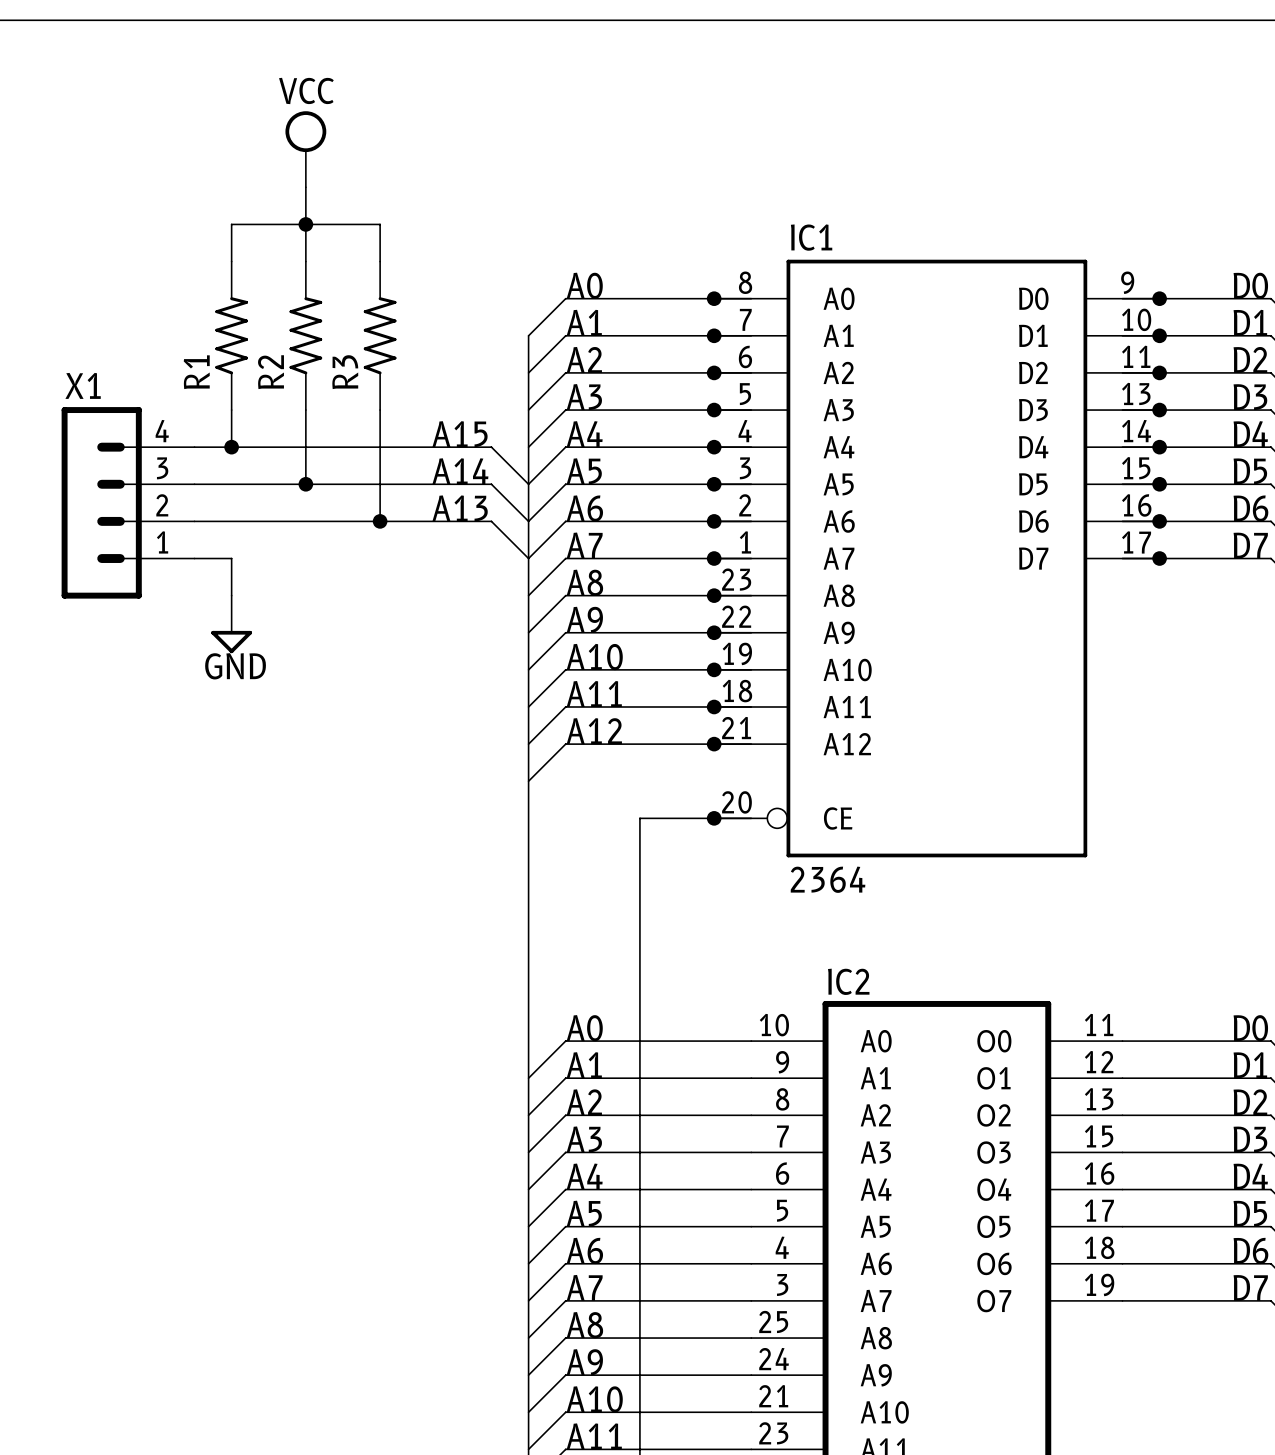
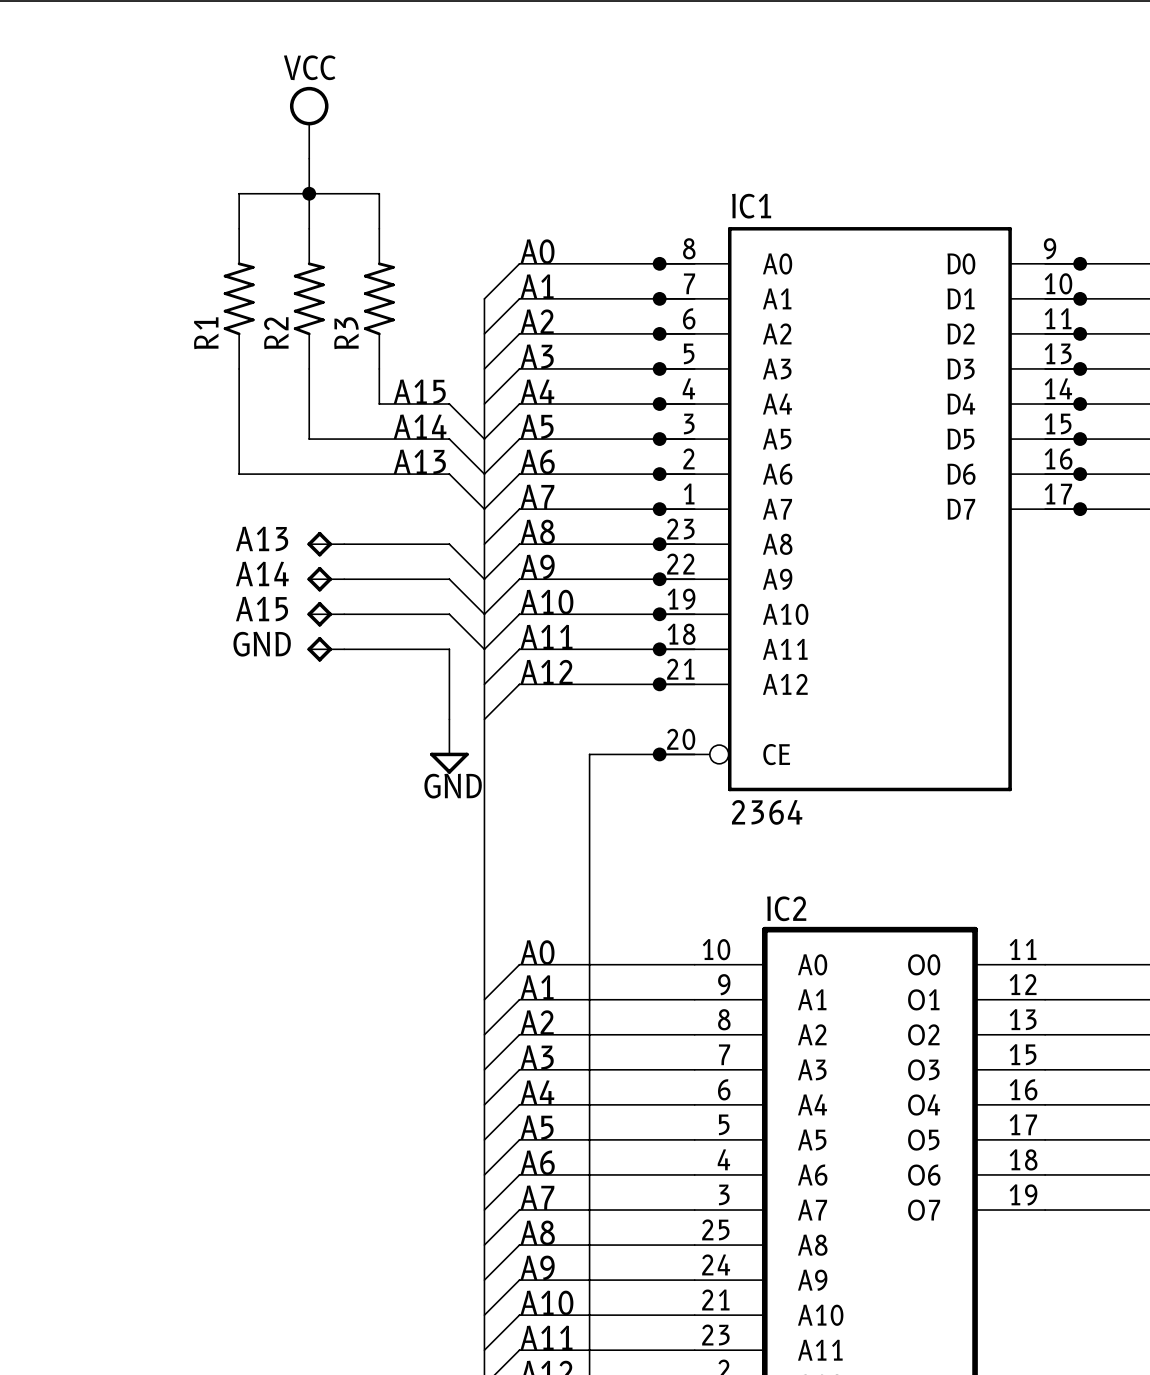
power symbol position: VCC (305, 149) -> VCC (309, 122)
wire: (305, 187) (305, 261) -> (309, 158) (309, 228)
wire: (268, 224) (231, 224) (231, 261) -> (239, 193) (239, 228)
junction position: (305, 224) -> (309, 193)
wire: (380, 224) (380, 261) -> (344, 193) (379, 193) (379, 228)
R1 position: (231, 335) -> (239, 298)
R2 position: (305, 335) -> (309, 298)
R3 position: (380, 335) -> (379, 298)
wire: (231, 410) (231, 447) -> none
wire: (305, 410) (305, 484) -> none
wire: (380, 410) (380, 521) -> none
wire: (194, 447) (417, 447) -> (379, 368) (379, 404)
junction: (231, 447) -> none
wire: (194, 484) (342, 484) -> (309, 368) (309, 439)
junction: (305, 484) -> none
X1: (128, 502) -> none
wire: (194, 521) (268, 521) -> (239, 368) (239, 474)
junction: (380, 521) -> none
wire: (194, 558) (231, 558) (231, 595) -> none
A13: none -> (325, 544)
wire: none -> (344, 544) (449, 544) (484, 579)
power symbol position: GND (231, 624) -> GND (449, 746)
A14: none -> (325, 579)
wire: none -> (344, 579) (449, 579) (484, 614)
A15: none -> (325, 614)
wire: none -> (344, 614) (449, 614) (484, 649)
GND: none -> (325, 649)
wire: none -> (344, 649) (449, 649) (449, 719)

